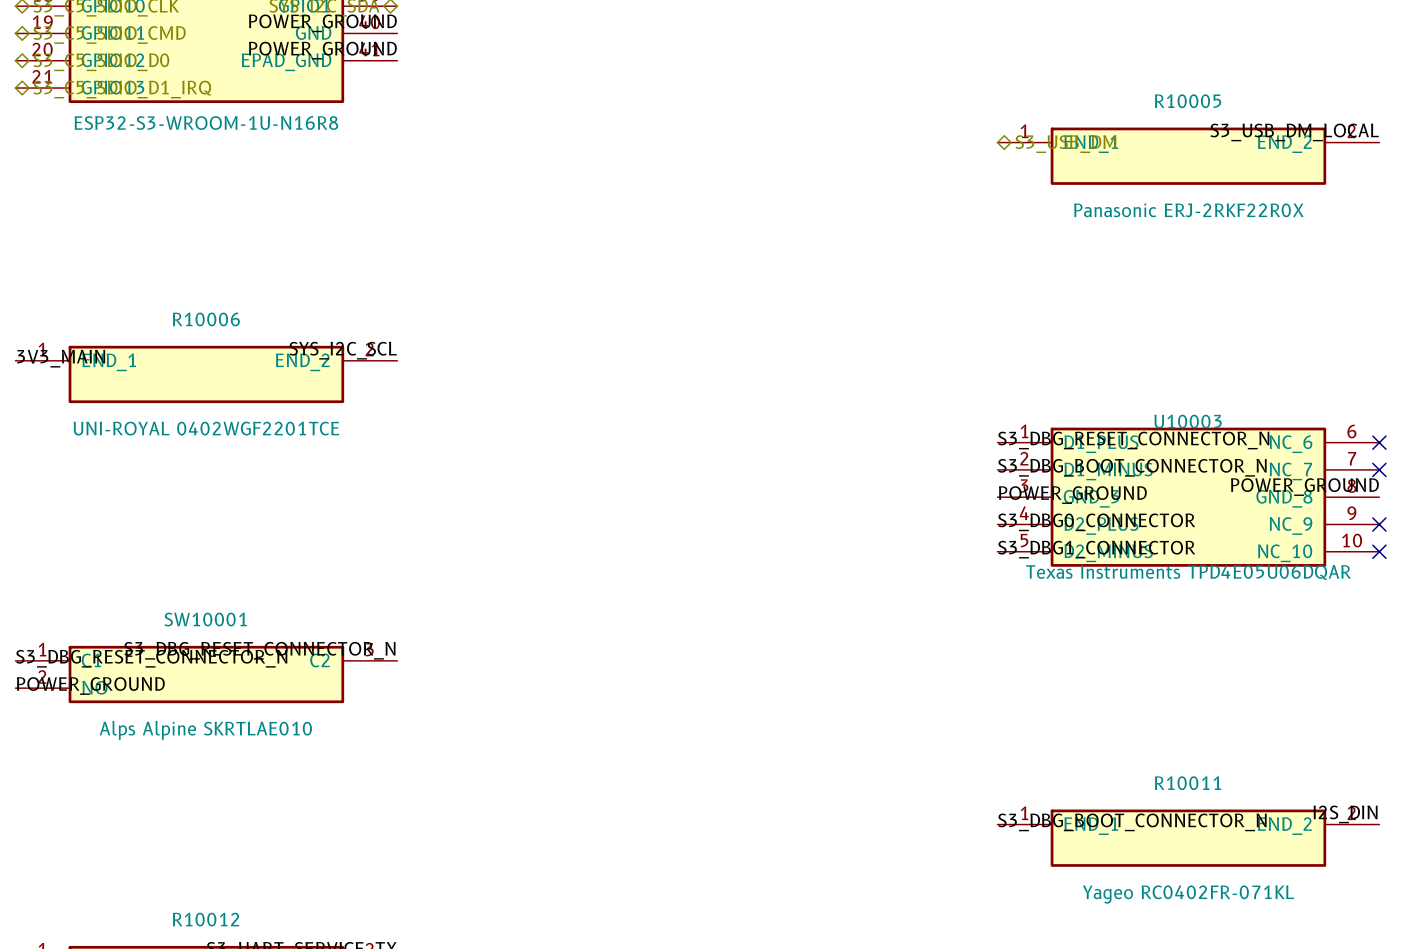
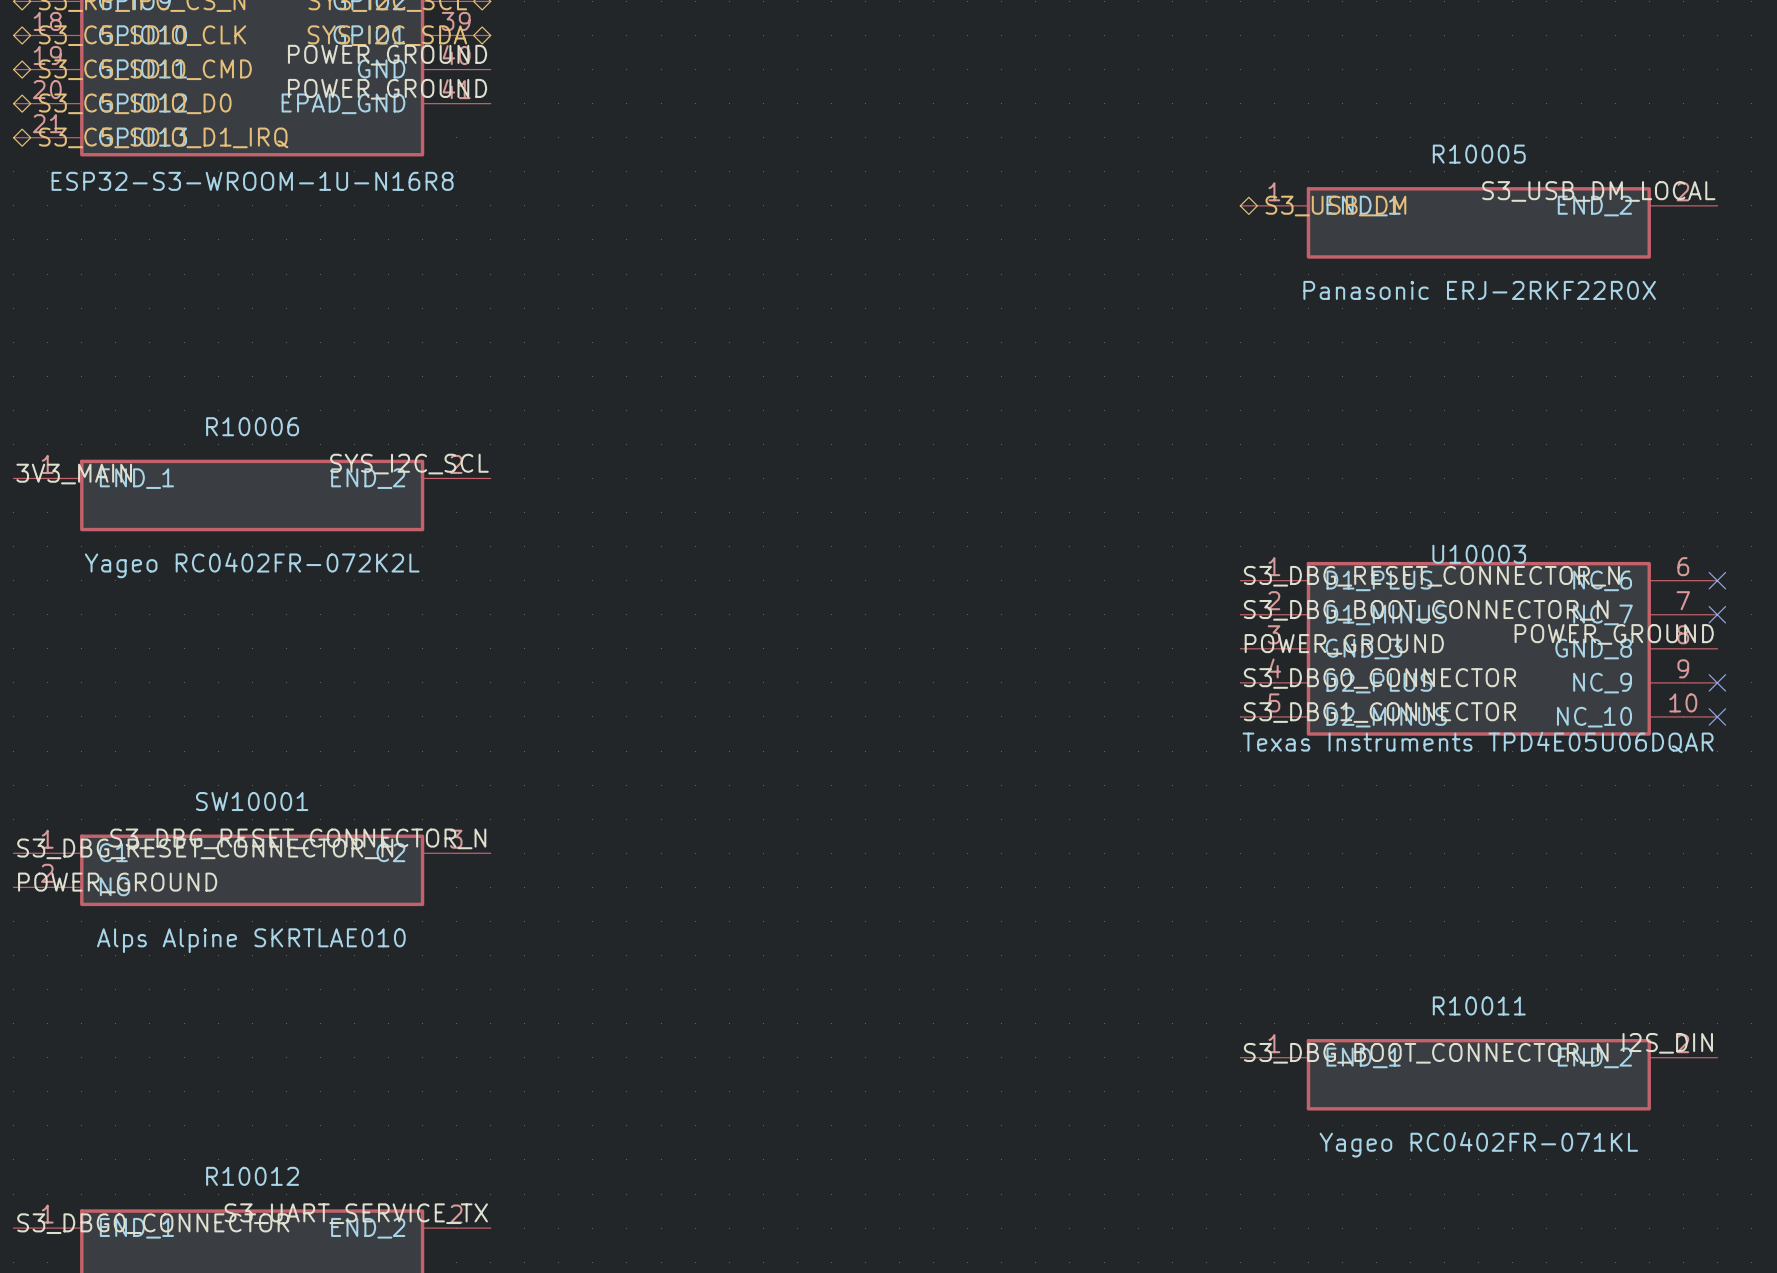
R10006 value: UNI-ROYAL 0402WGF2201TCE (206, 428) -> Yageo RC0402FR-072K2L (252, 565)

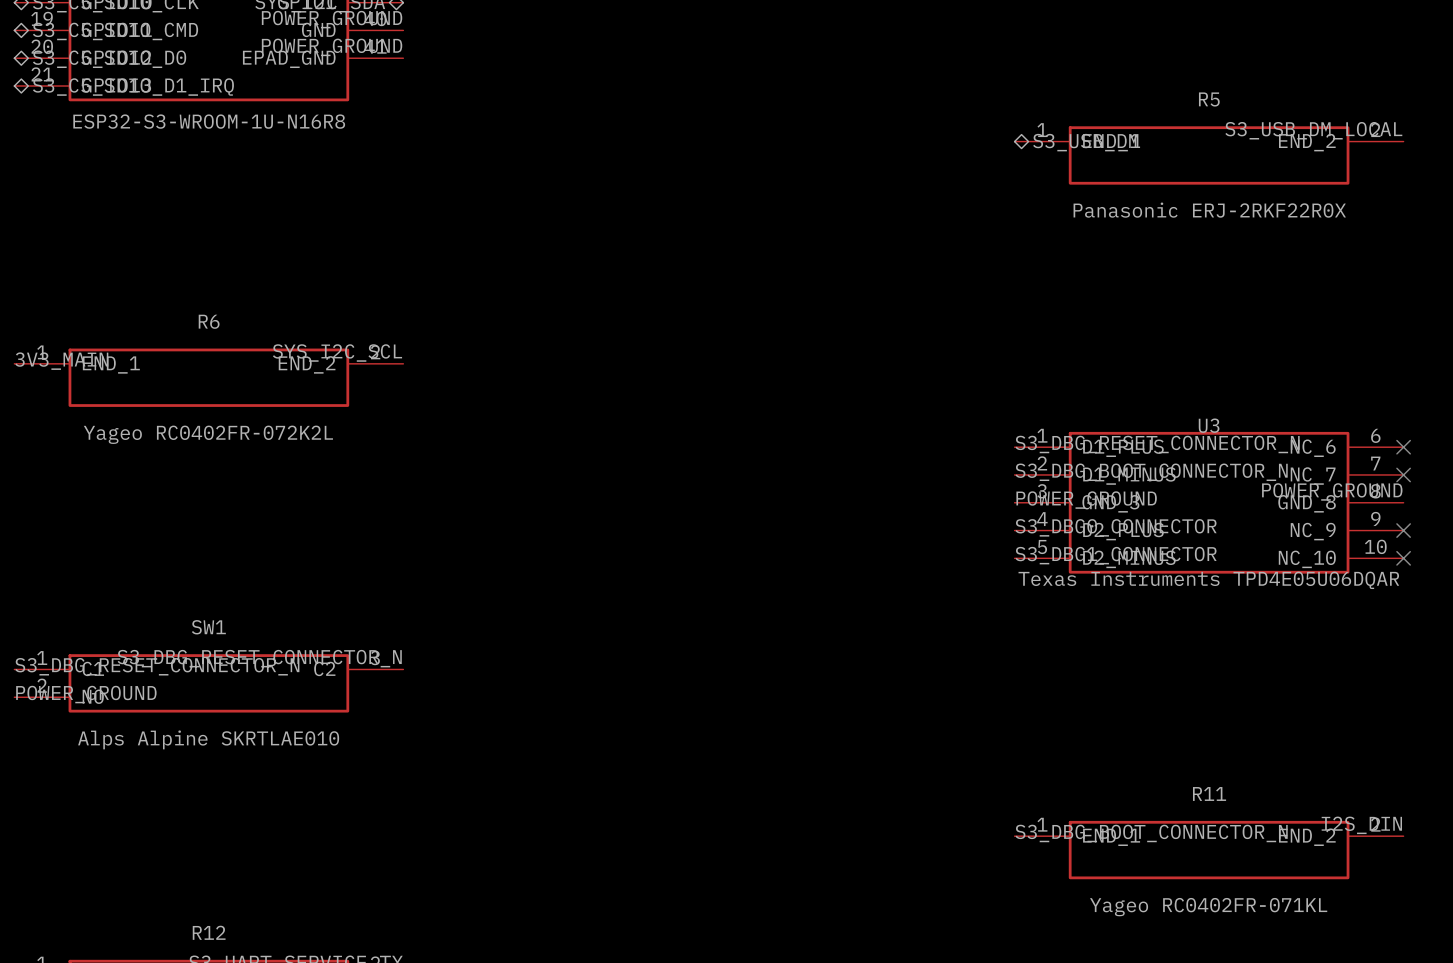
R10005 name: R10005 (1479, 154) -> R5 (1209, 99)
R10006 name: R10006 (252, 426) -> R6 (209, 321)
U10003 name: U10003 (1479, 554) -> U3 (1209, 425)
SW10001 name: SW10001 (252, 801) -> SW1 (208, 627)
R10011 name: R10011 (1479, 1005) -> R11 (1209, 793)
R10012 name: R10012 (252, 1176) -> R12 (209, 932)

